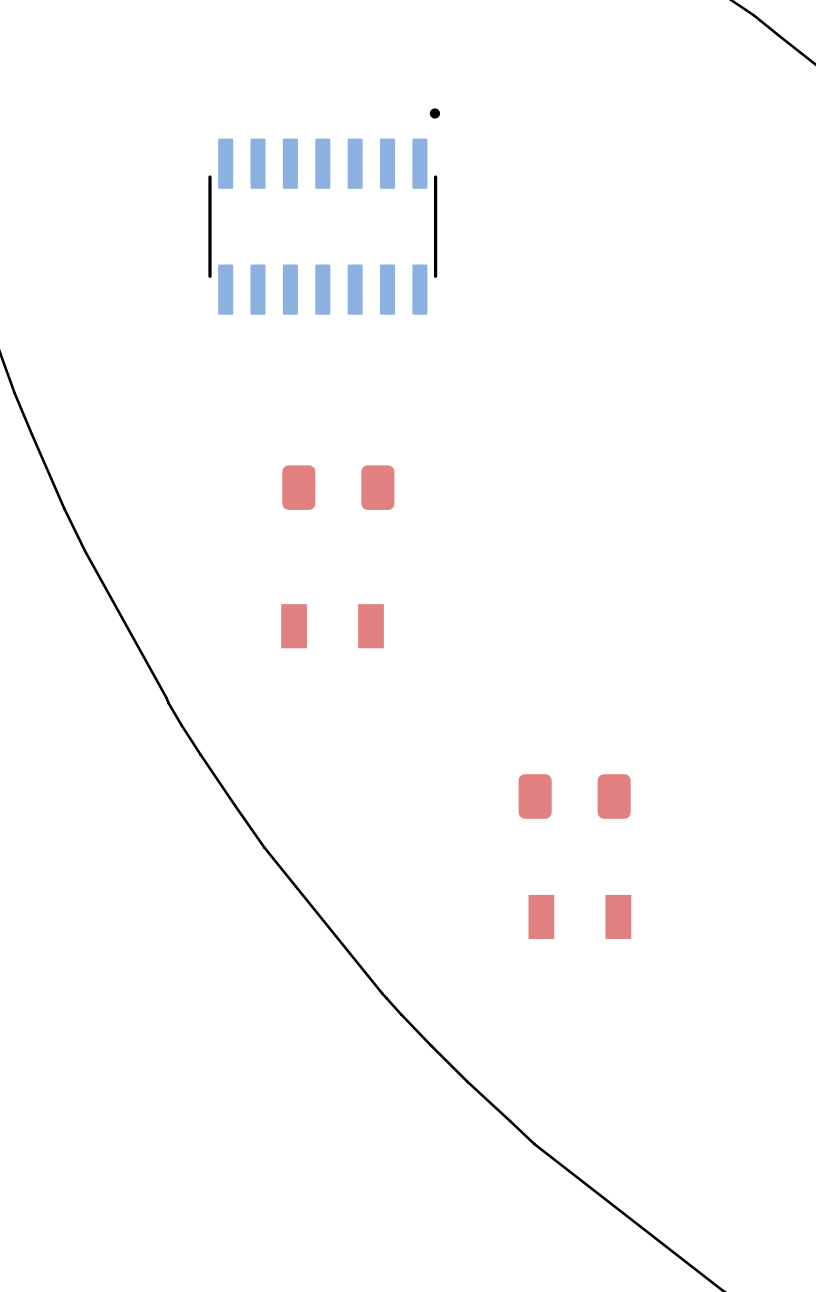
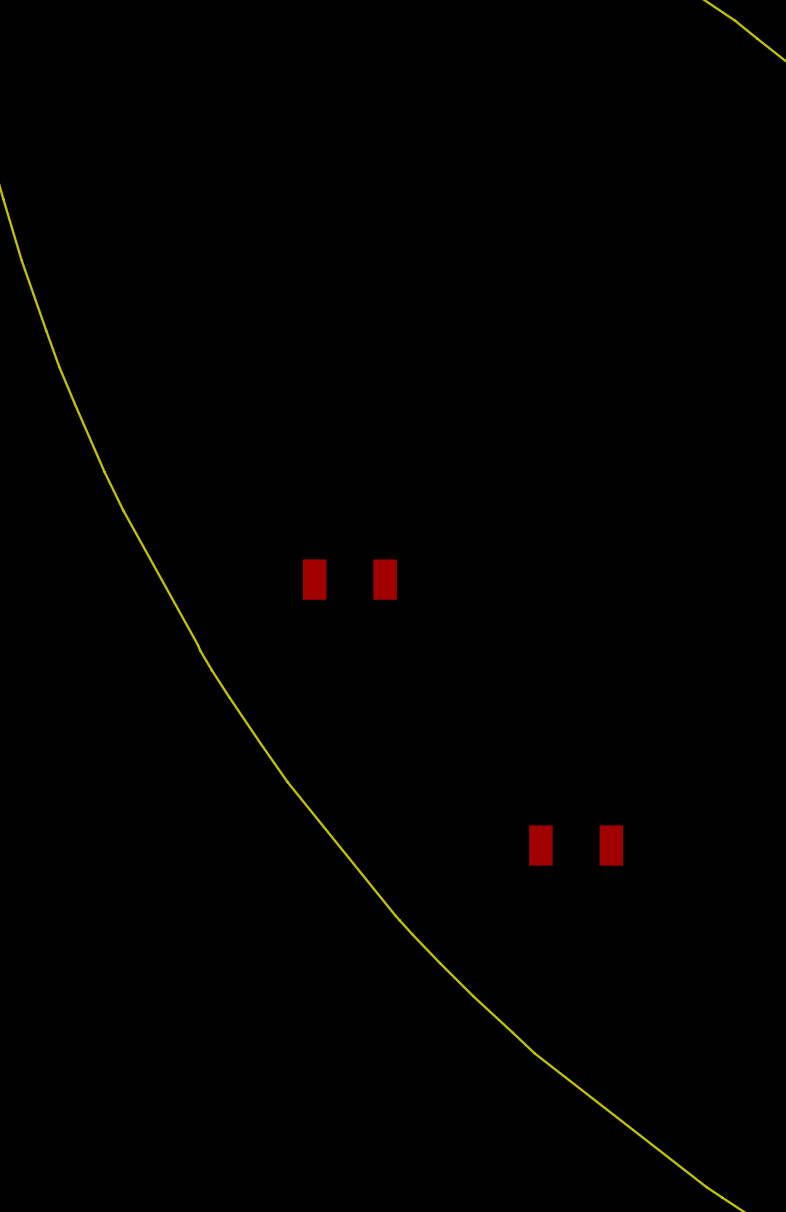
part: (324, 211) -> none
part: (338, 487) -> none
part: (574, 796) -> none

